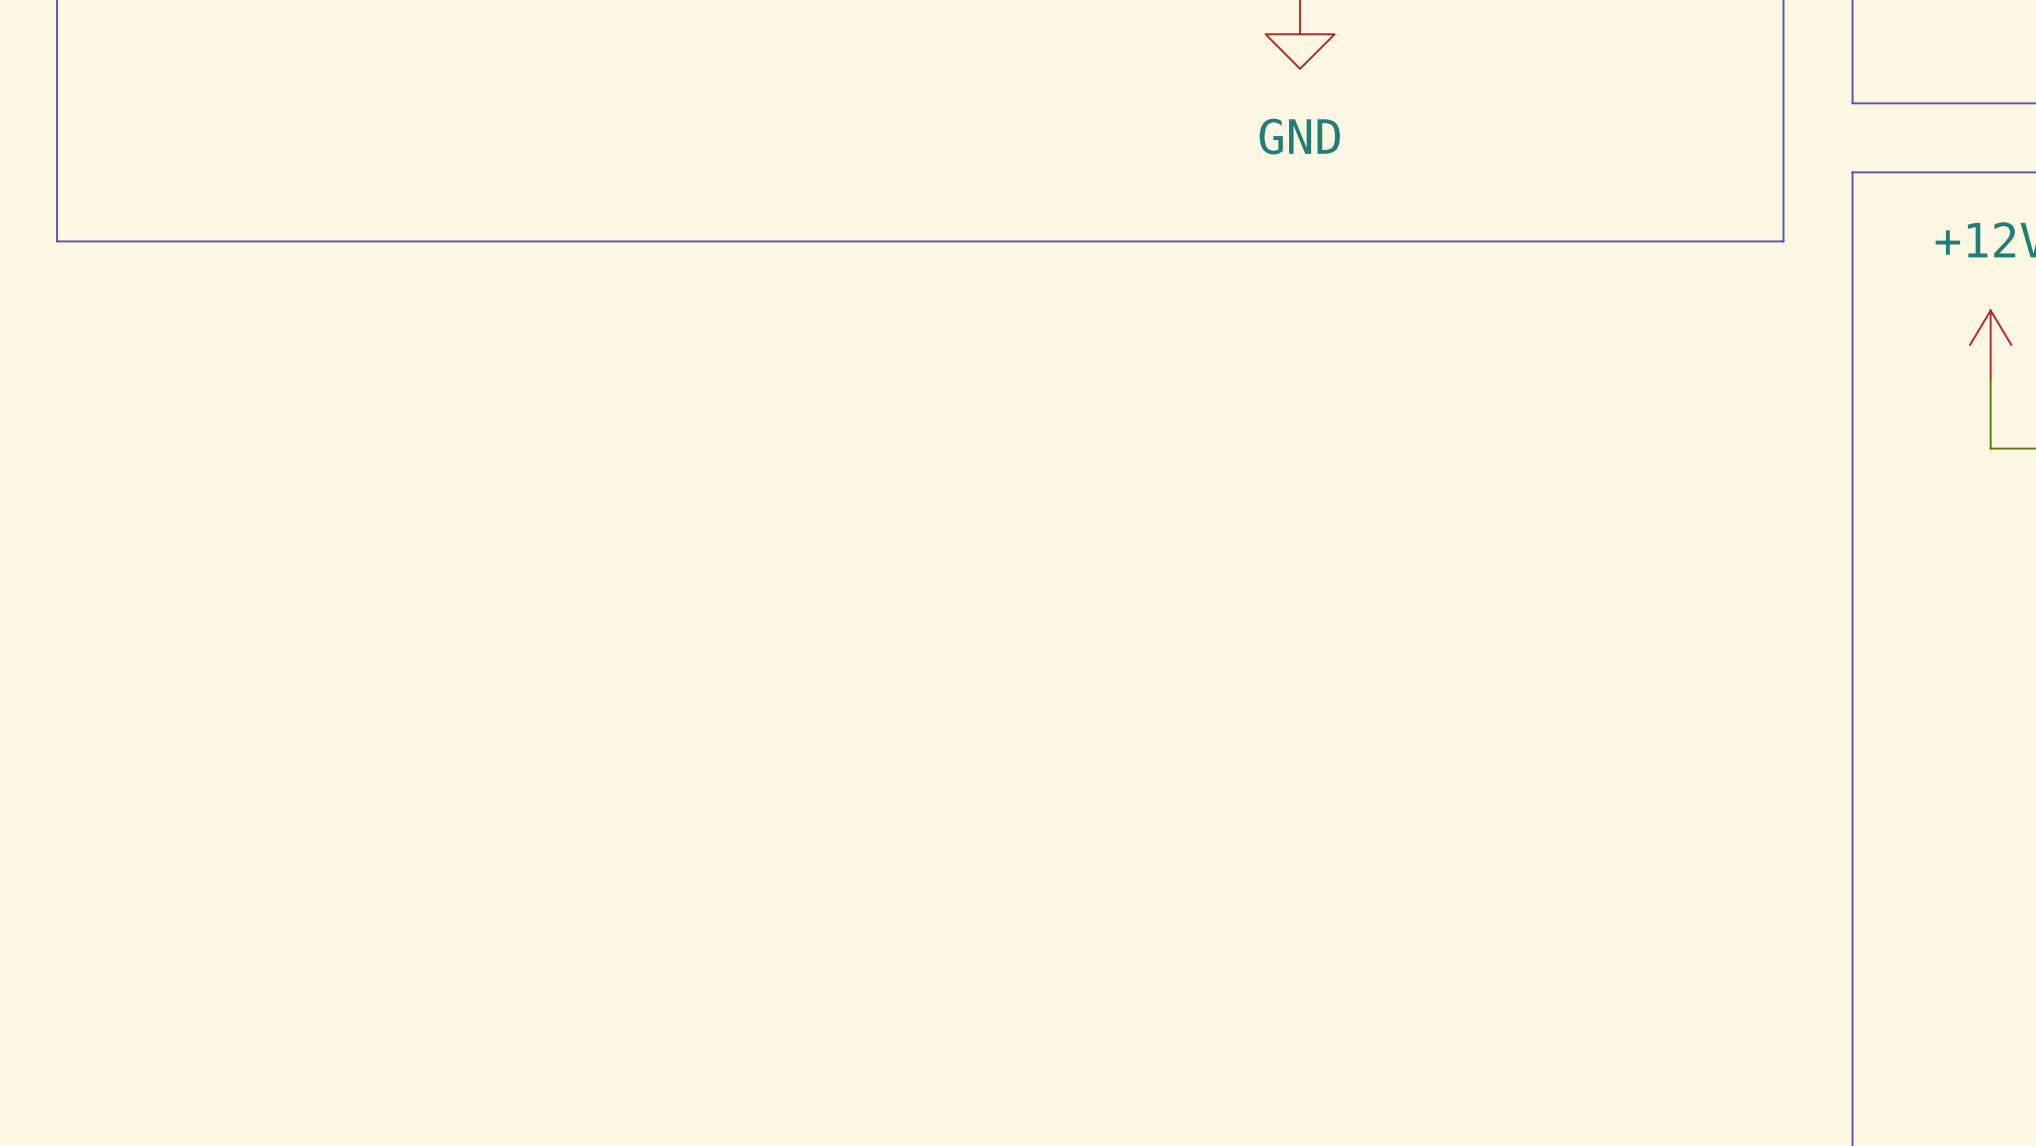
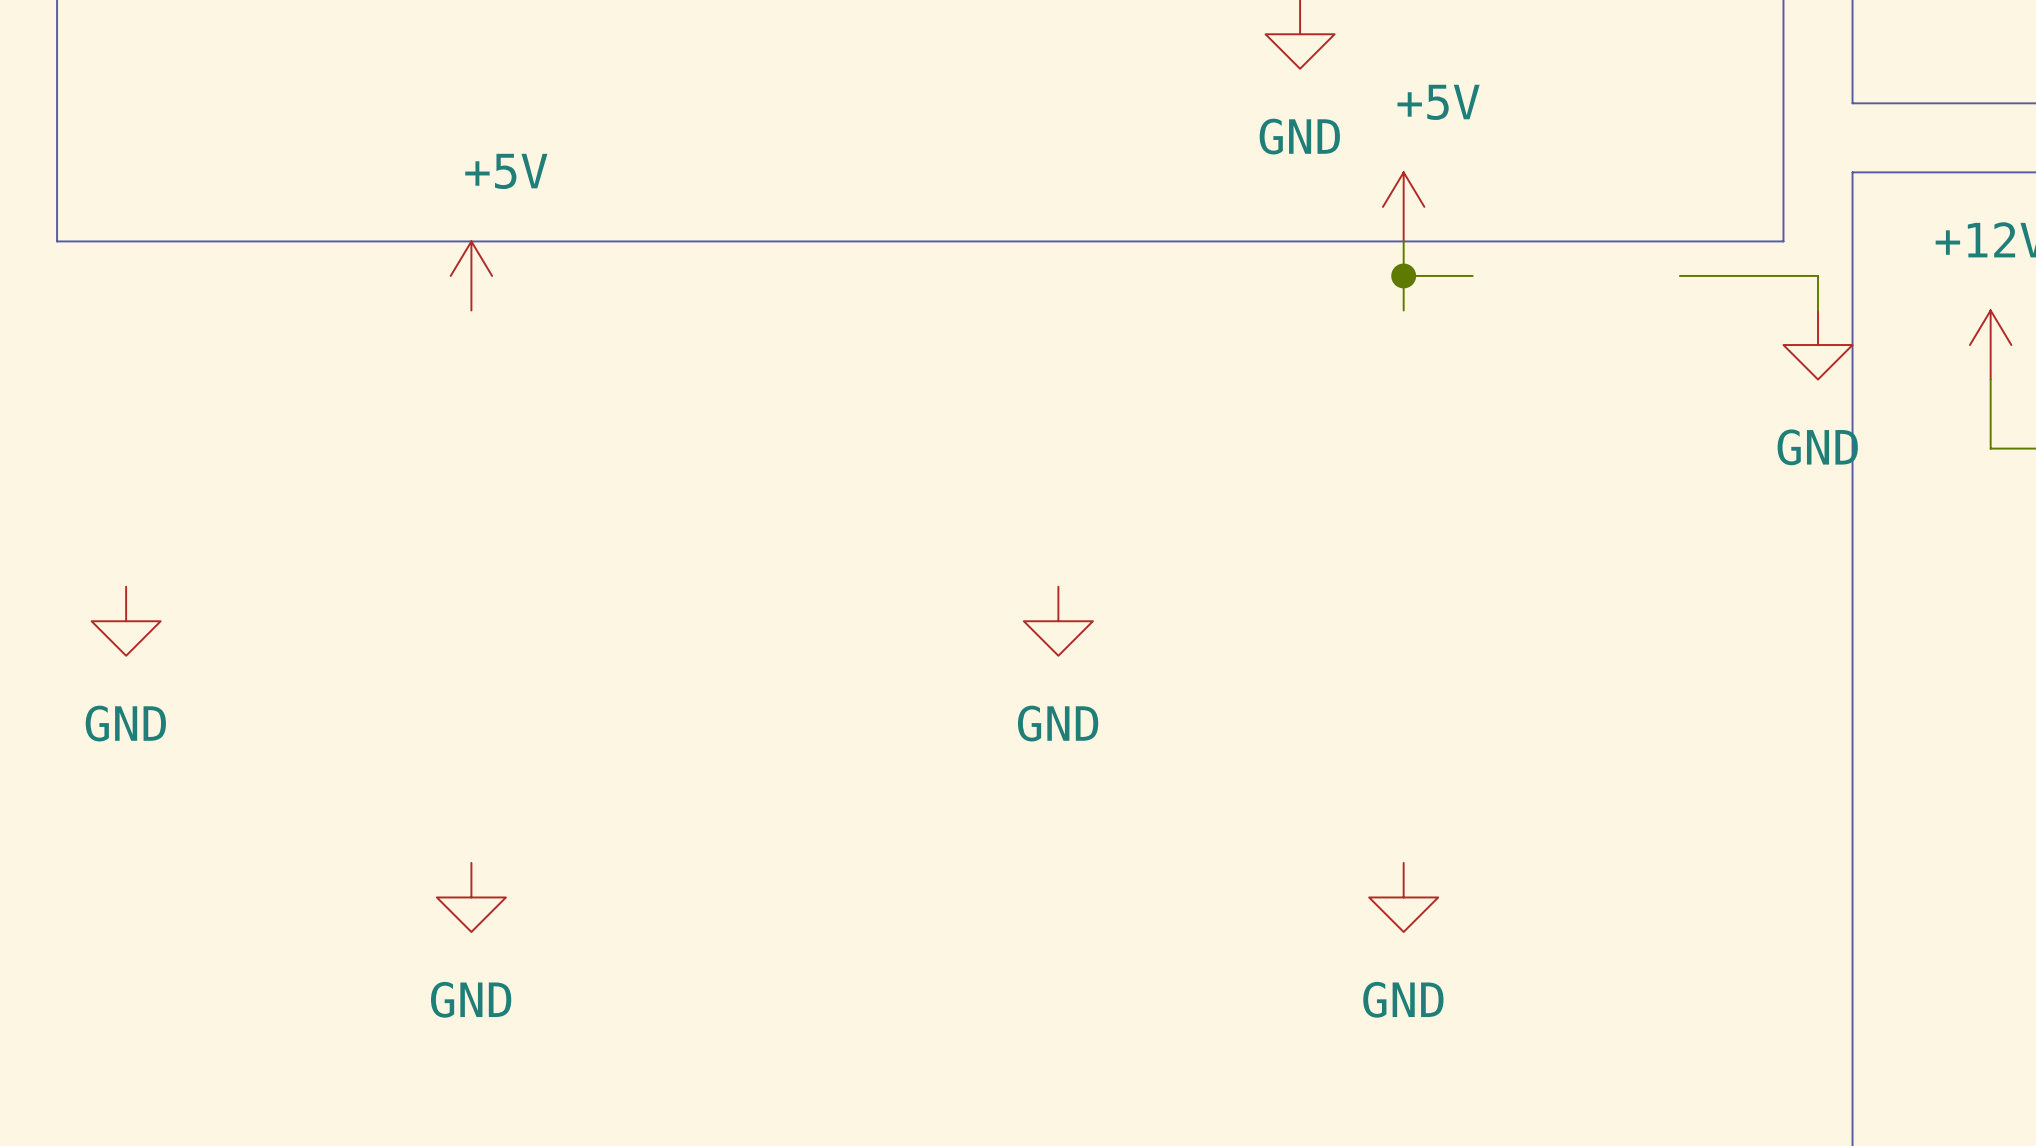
power symbol: none -> +5V (1403, 206)
wire: none -> (1403, 241) (1403, 310)
power symbol: none -> +5V (471, 275)
wire: none -> (1403, 275) (1472, 275)
junction: none -> (1403, 275)
wire: none -> (1679, 275) (1818, 275) (1818, 310)
power symbol: none -> GND (1818, 345)
power symbol: none -> GND (126, 621)
power symbol: none -> GND (1058, 621)
power symbol: none -> GND (471, 897)
power symbol: none -> GND (1403, 897)

